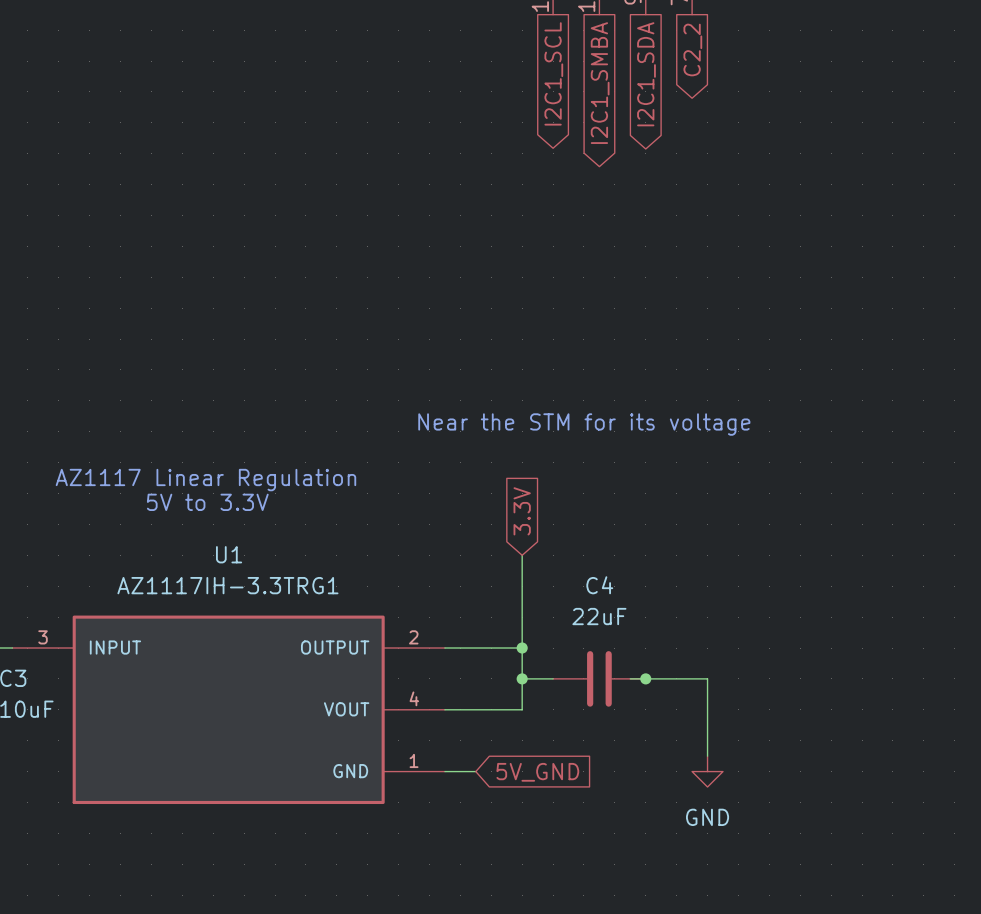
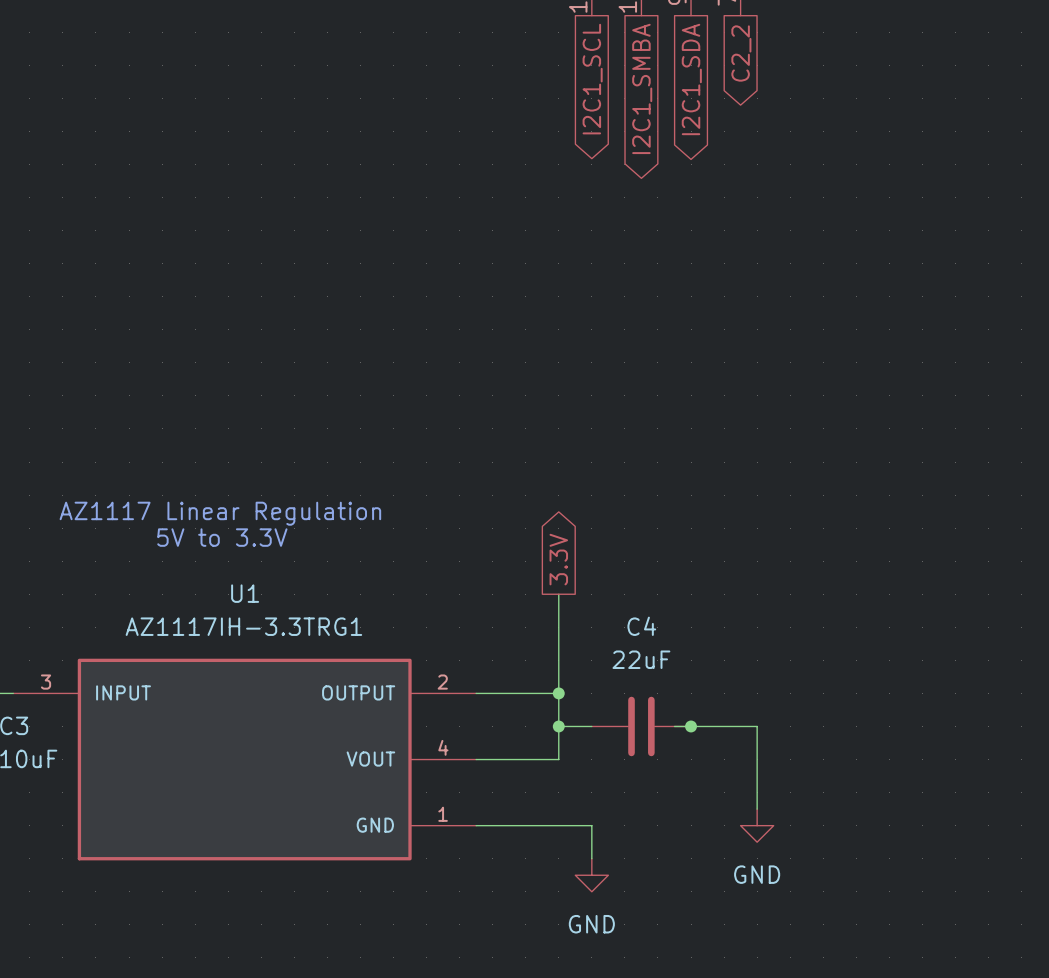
text: Near the STM for its voltage (584, 424) -> none
global label shape: input (522, 511) -> output (558, 559)
wire: none -> (509, 825) (591, 825) (591, 858)
global label: 5V_GND (537, 772) -> none
power symbol: none -> GND (591, 875)

